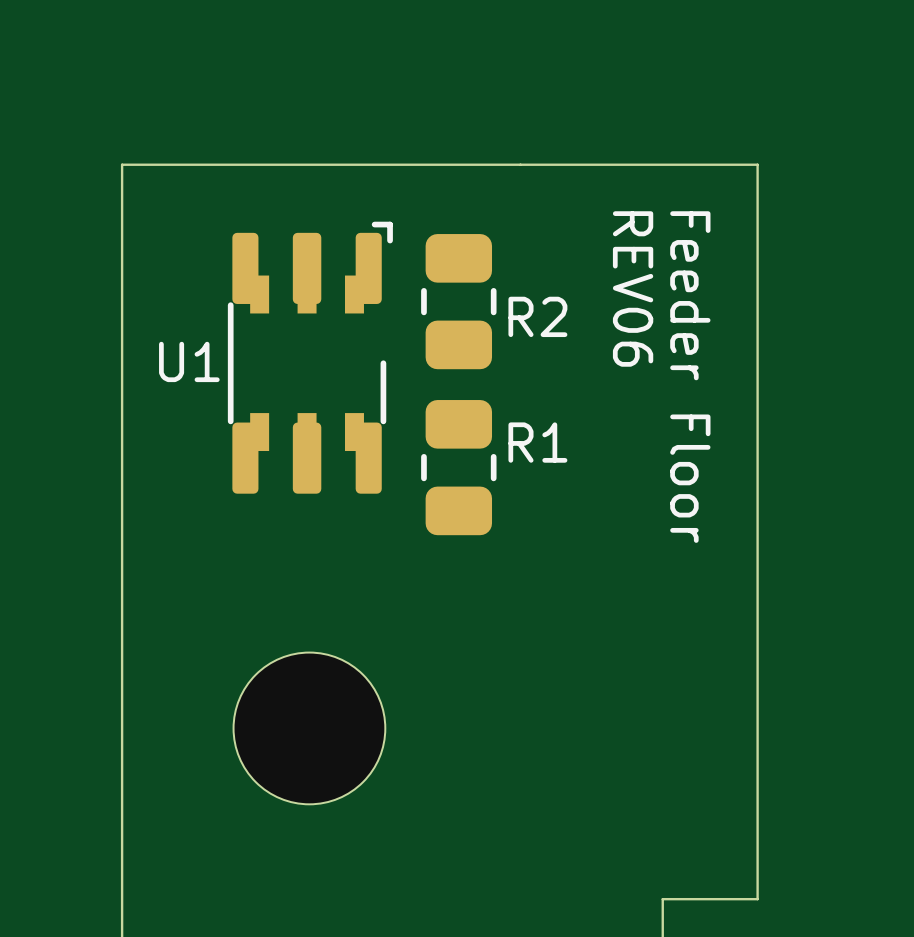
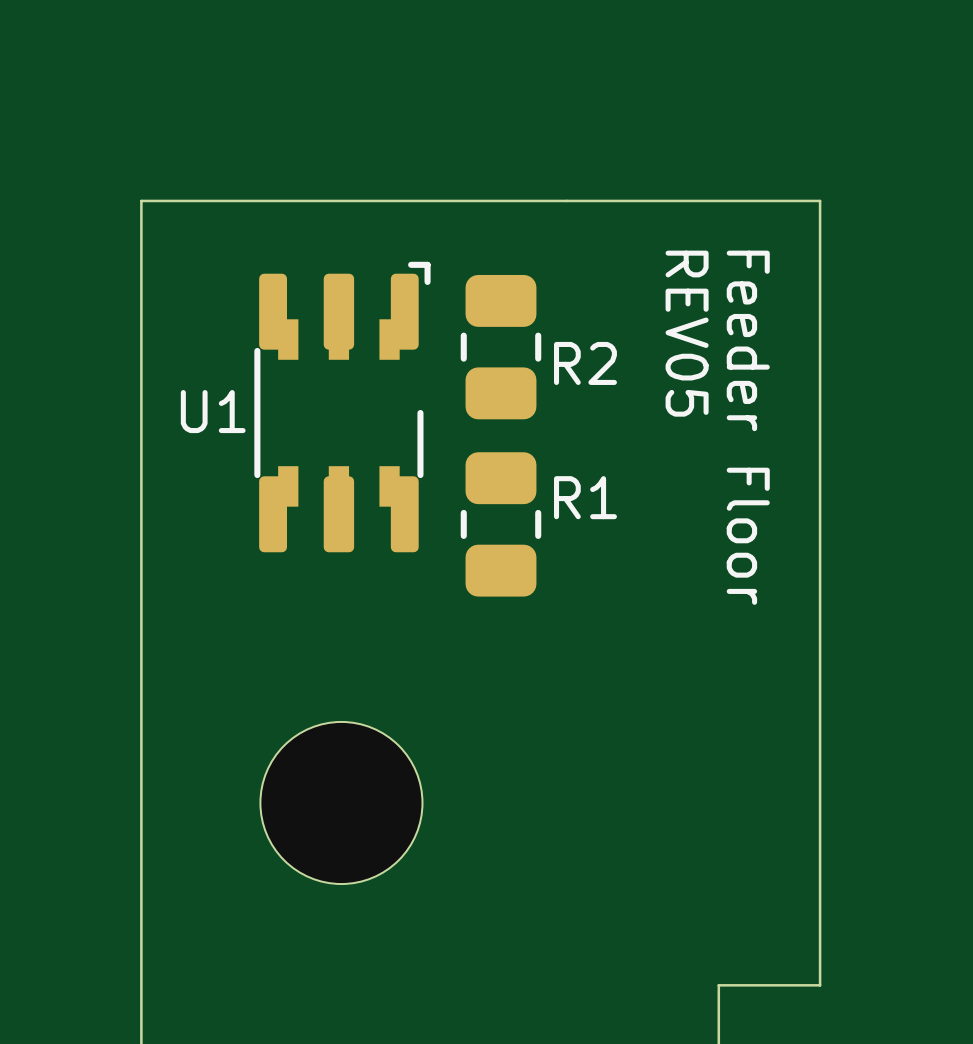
text: REV06 (633, 288) -> REV05 (687, 333)

